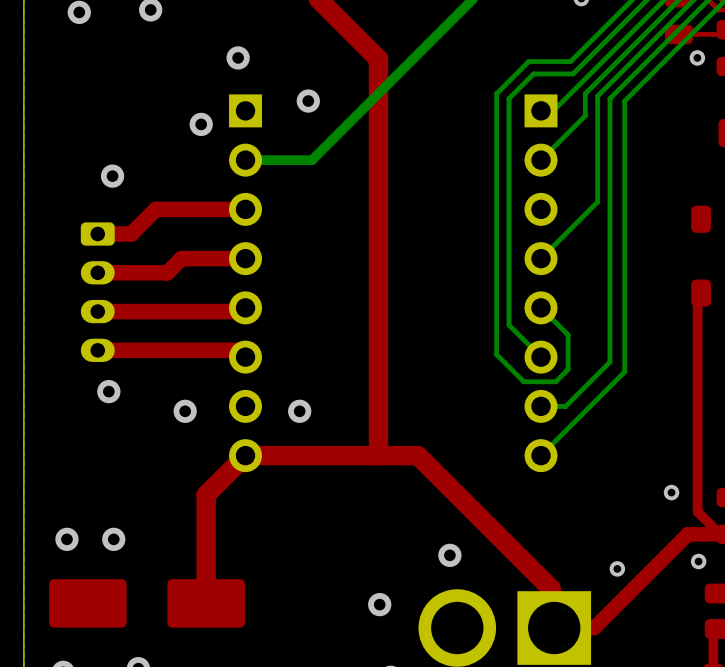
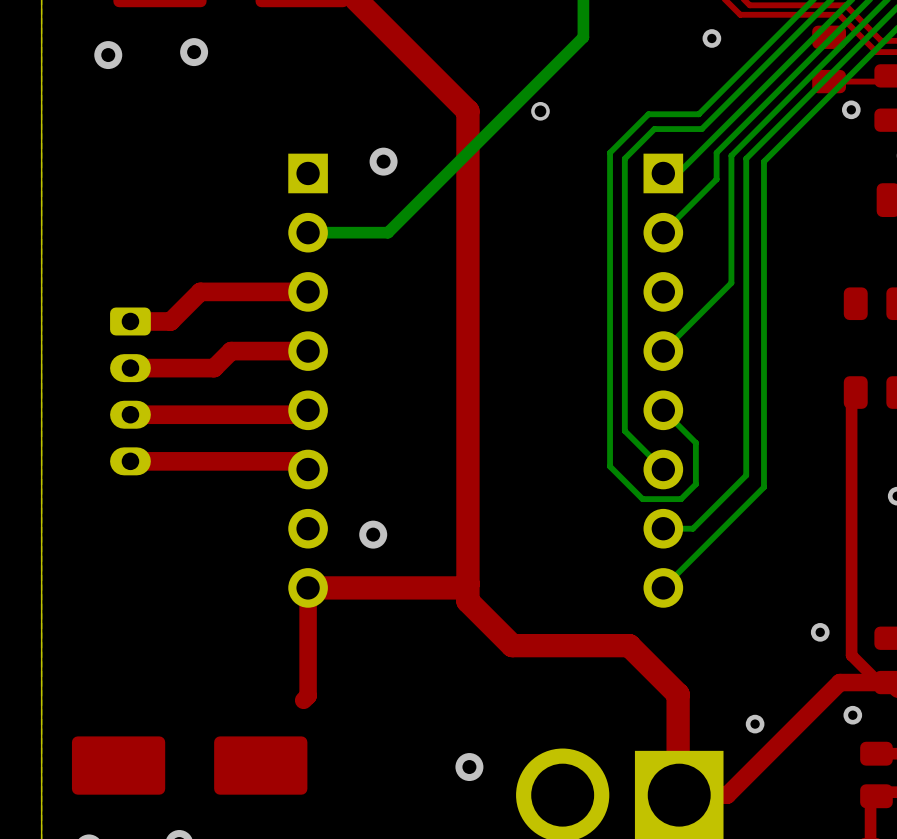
via: (238, 57) -> none
via: none -> (540, 111)
via: (201, 124) -> none
via: (112, 176) -> none
via: (108, 391) -> none
via: (185, 411) -> none
top track: (245, 455) (206, 494) (206, 603) -> (308, 587) (308, 695) (303, 700)
top track: (378, 455) (417, 455) (550, 588) (550, 628) (554, 628) -> (467, 587) (467, 601) (512, 645) (629, 645) (678, 694) (679, 795)
via: (66, 539) -> none
via: (113, 539) -> none
via: (449, 555) -> none

